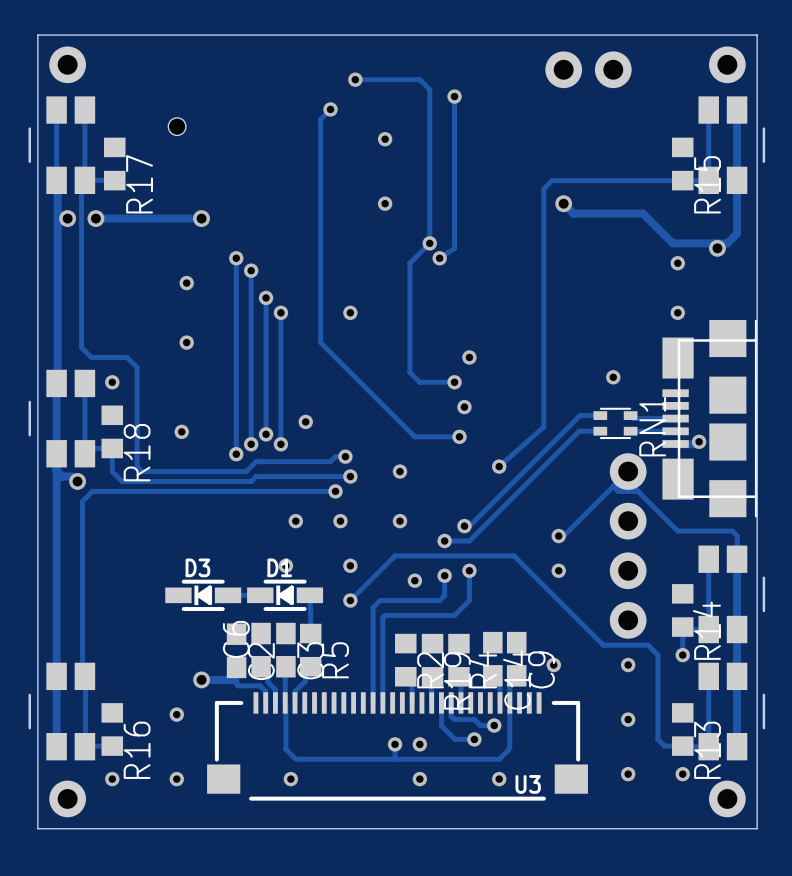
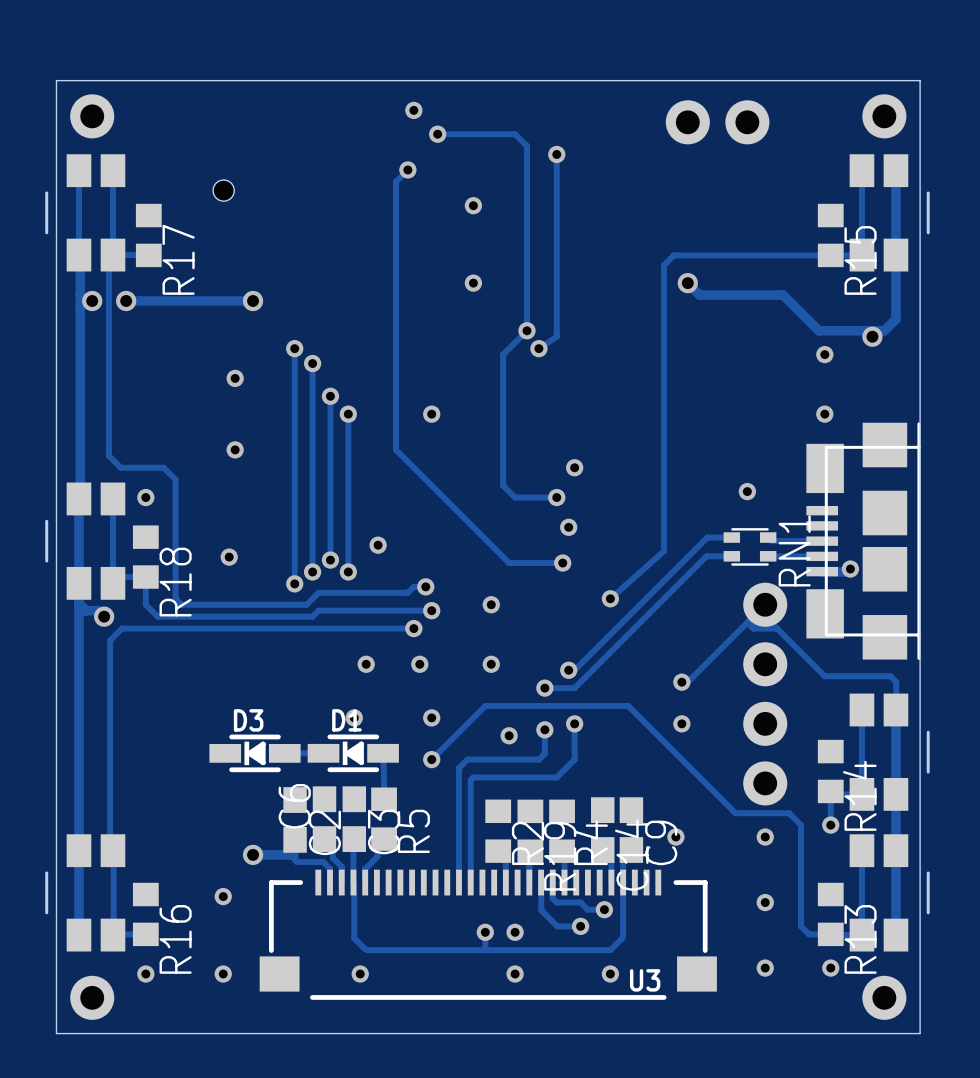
via: none -> (413, 110)

